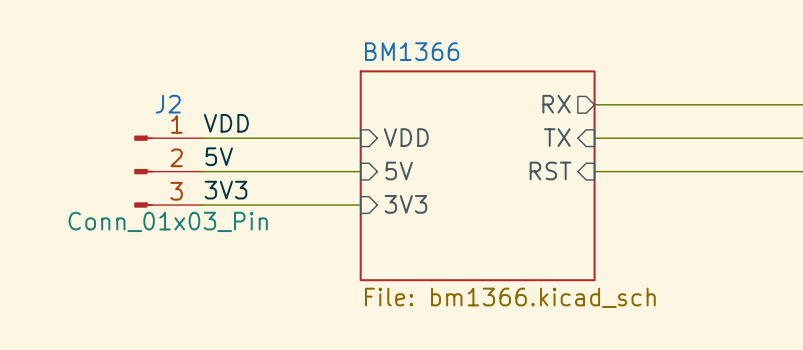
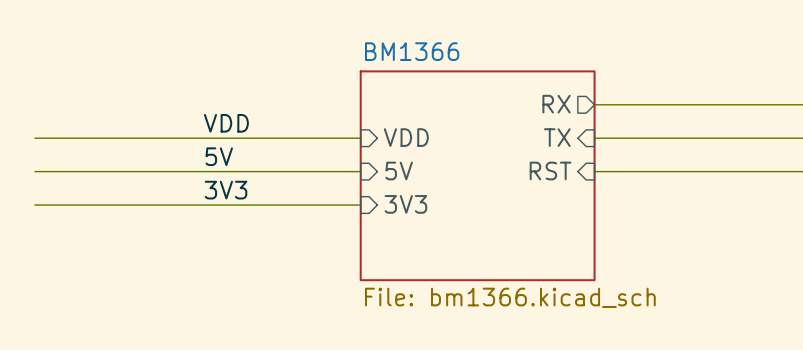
wire: none -> (34, 138) (202, 138)
wire: none -> (34, 171) (202, 171)
J2: Conn_01x03_Pin (168, 171) -> none
wire: none -> (34, 205) (202, 205)

